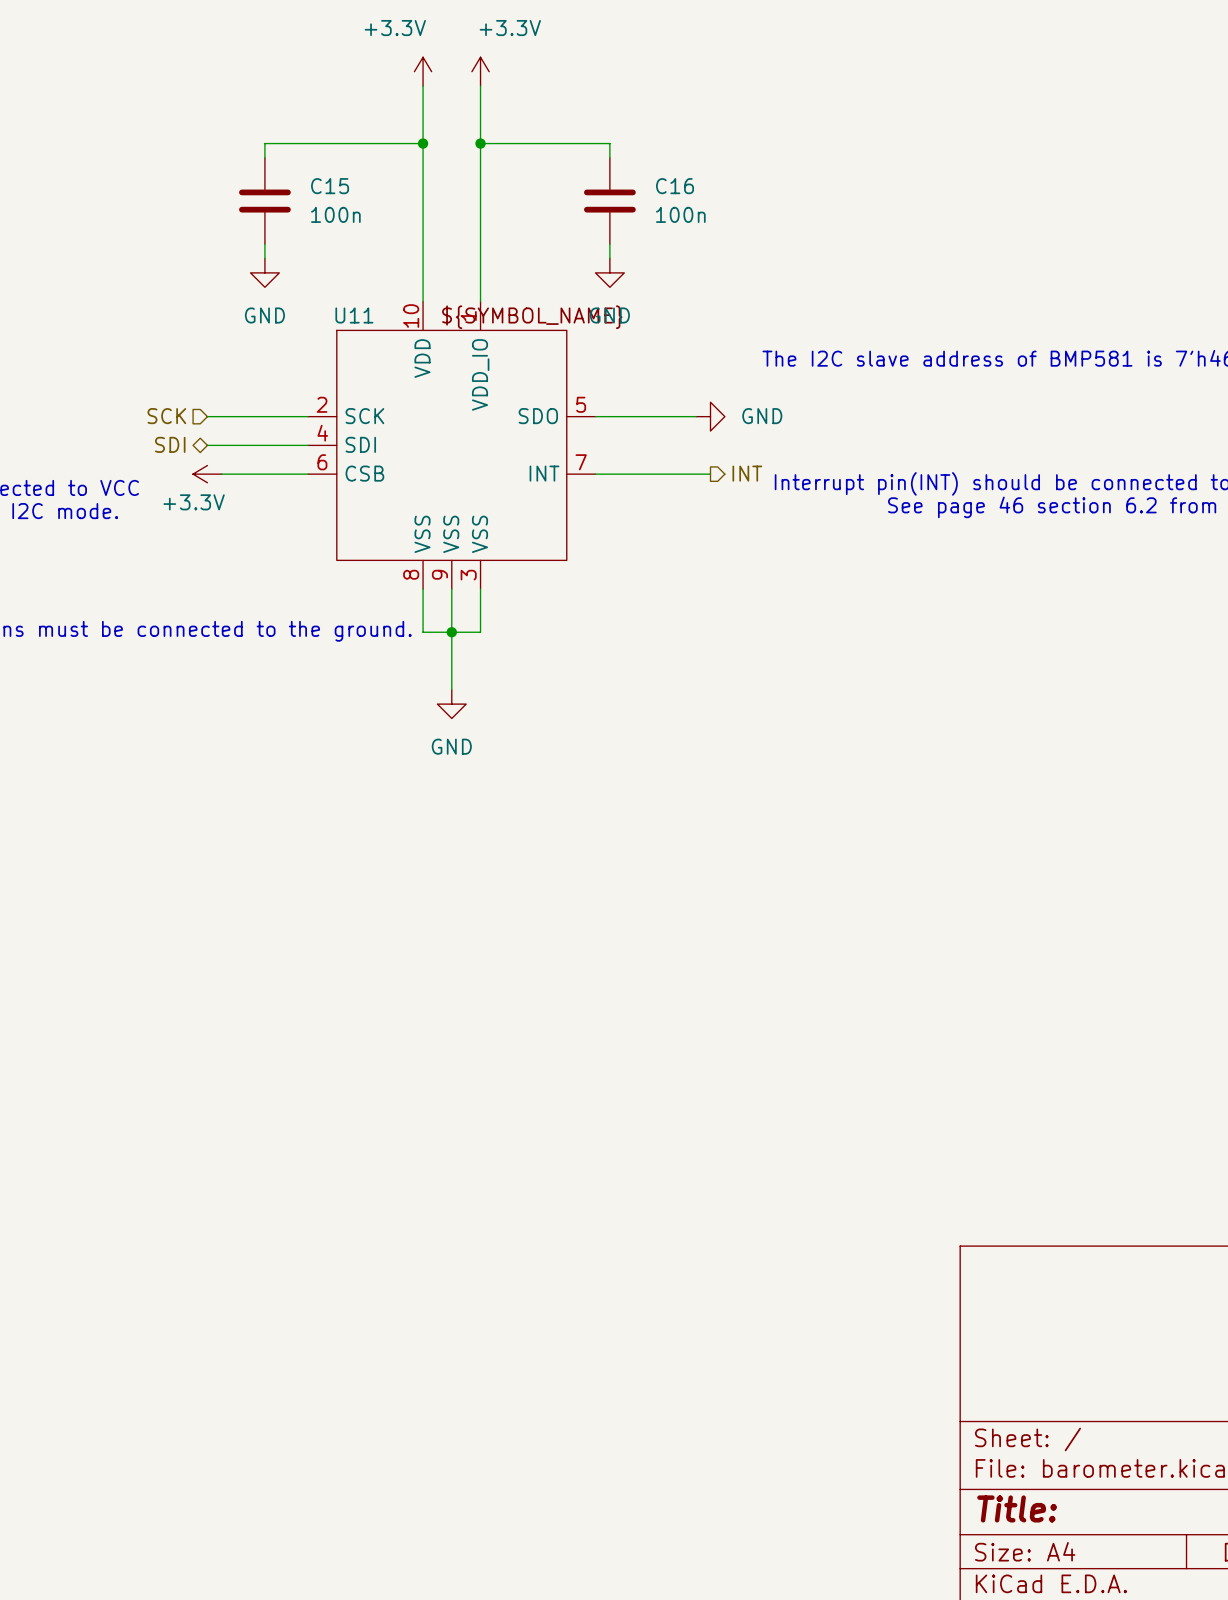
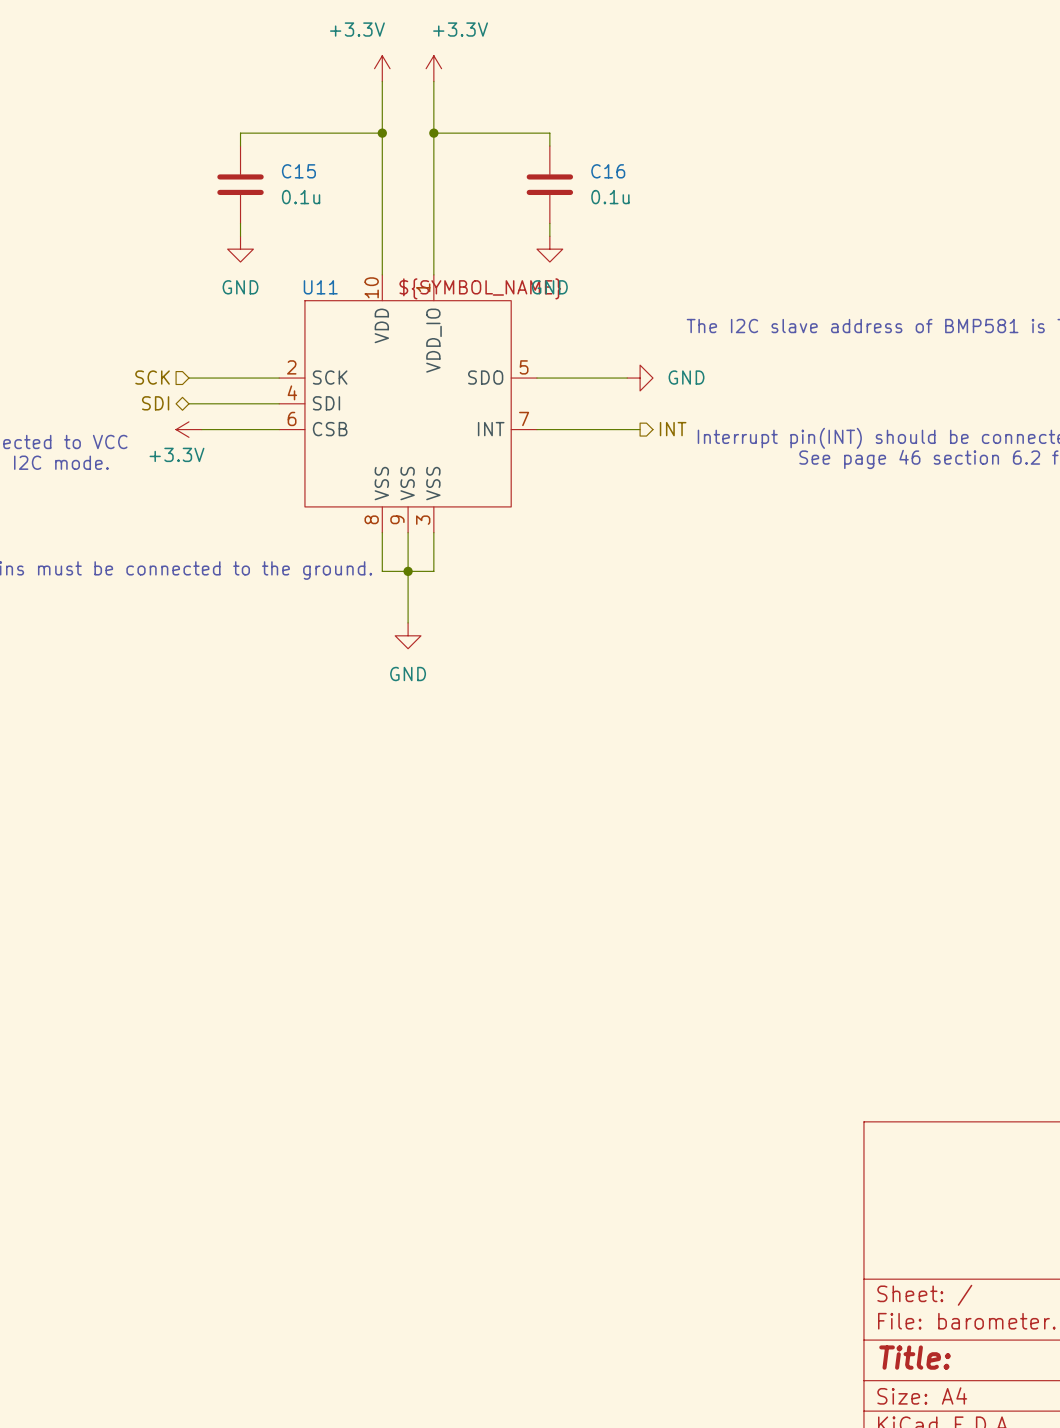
C15 value: 100n (335, 214) -> 0.1u (301, 197)
C16 value: 100n (680, 214) -> 0.1u (610, 197)

